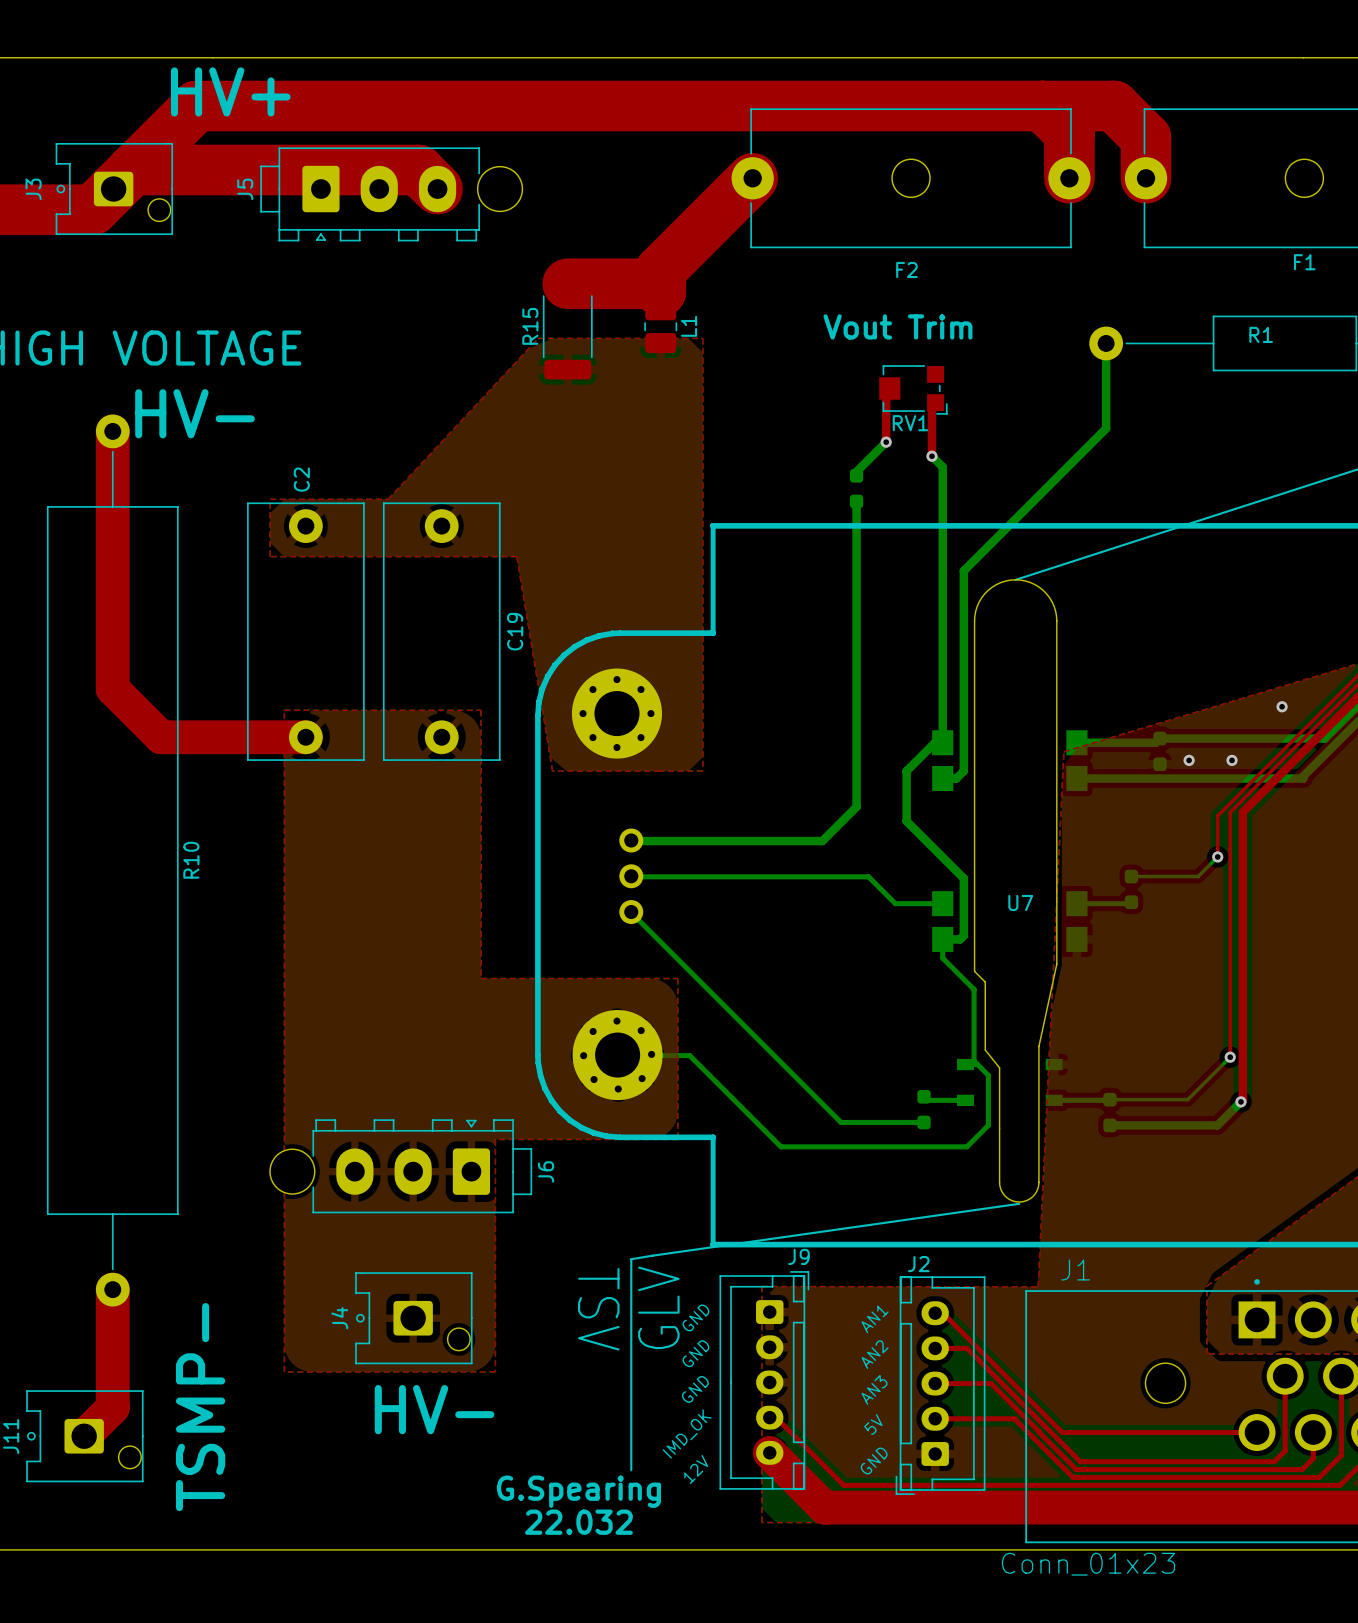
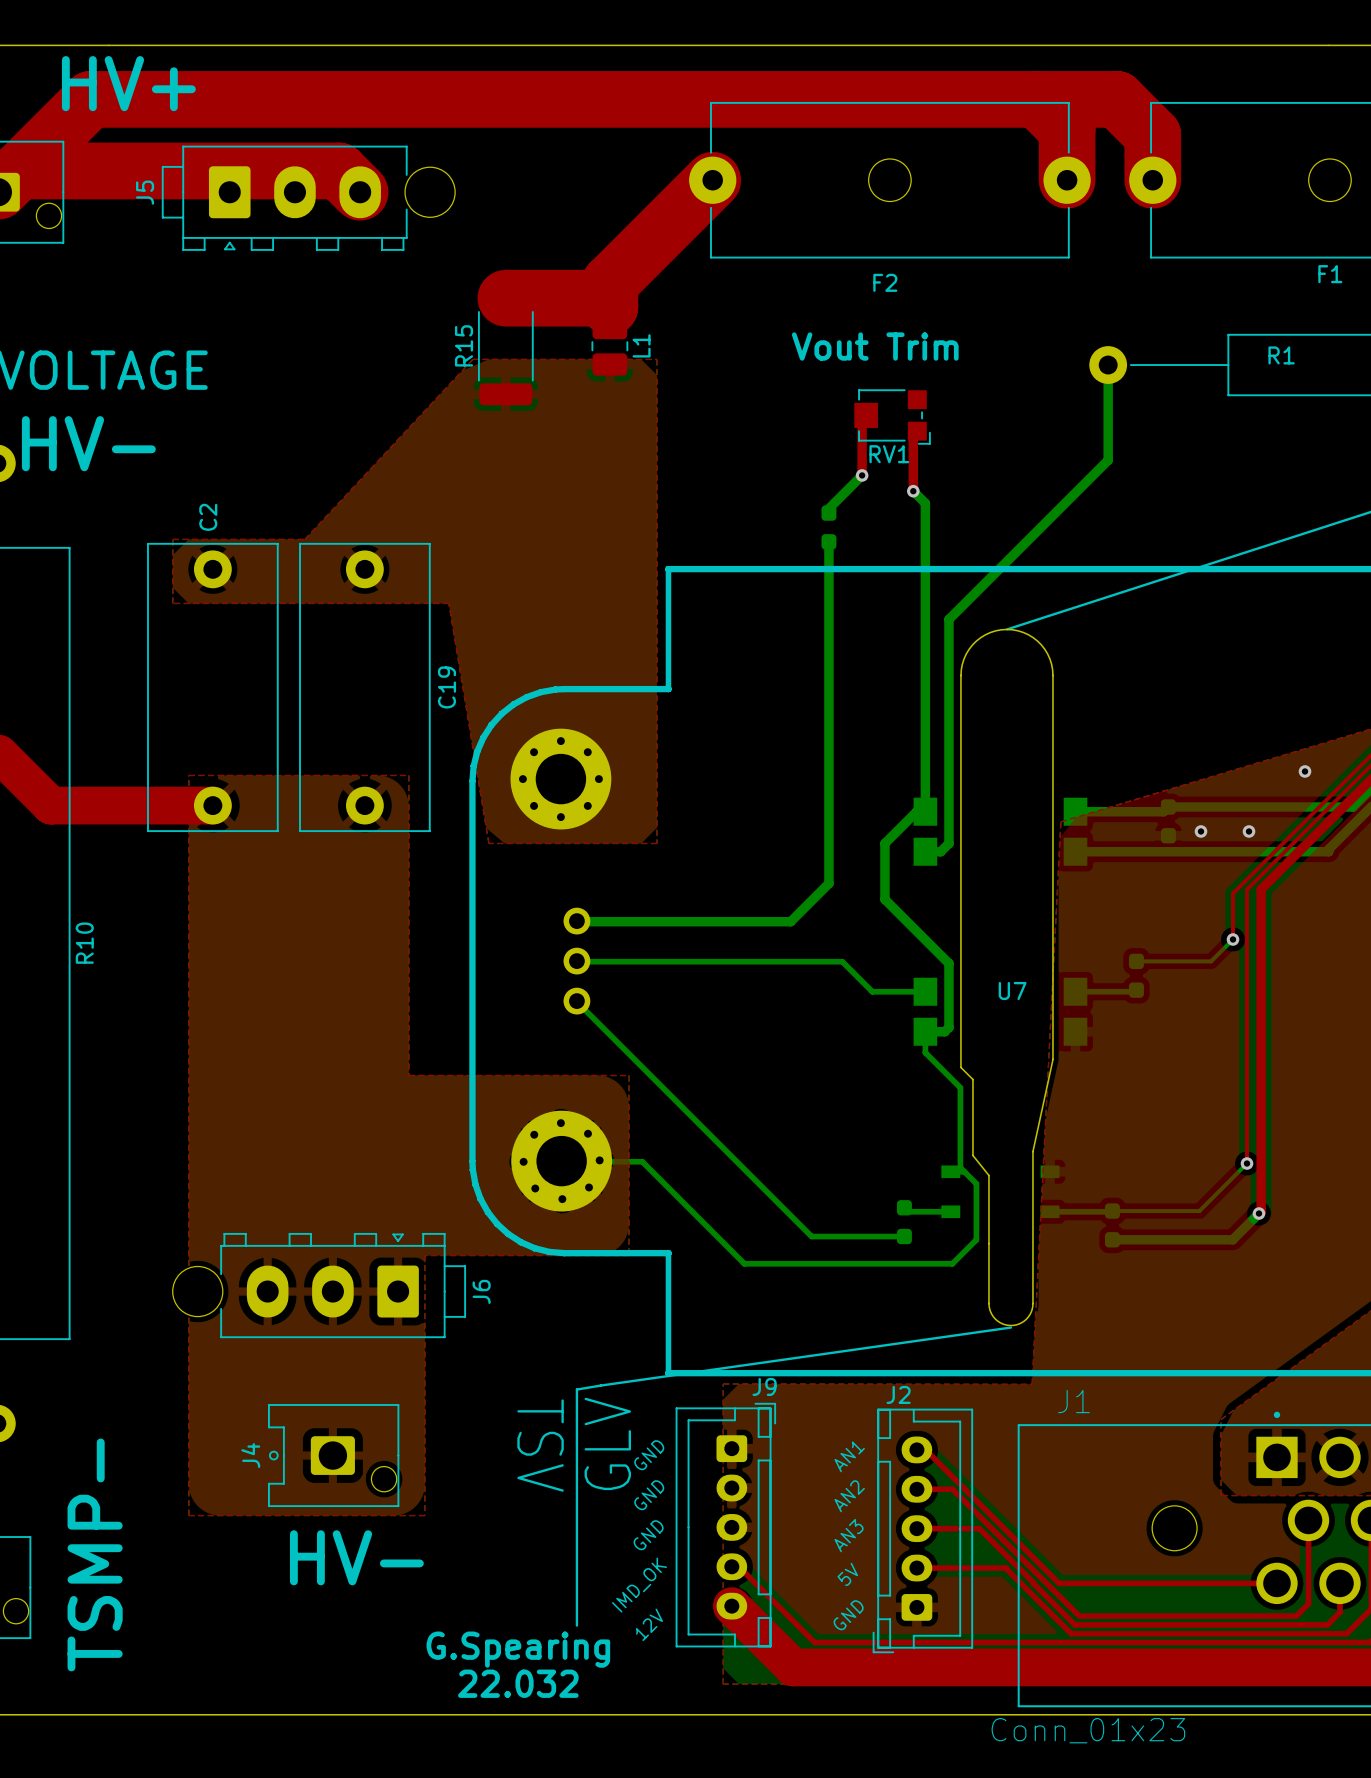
top zone outline: (1063, 751) (1038, 1286) (761, 1286) (762, 1522) -> (1060, 821) (1032, 1384) (723, 1383) (723, 1684)

